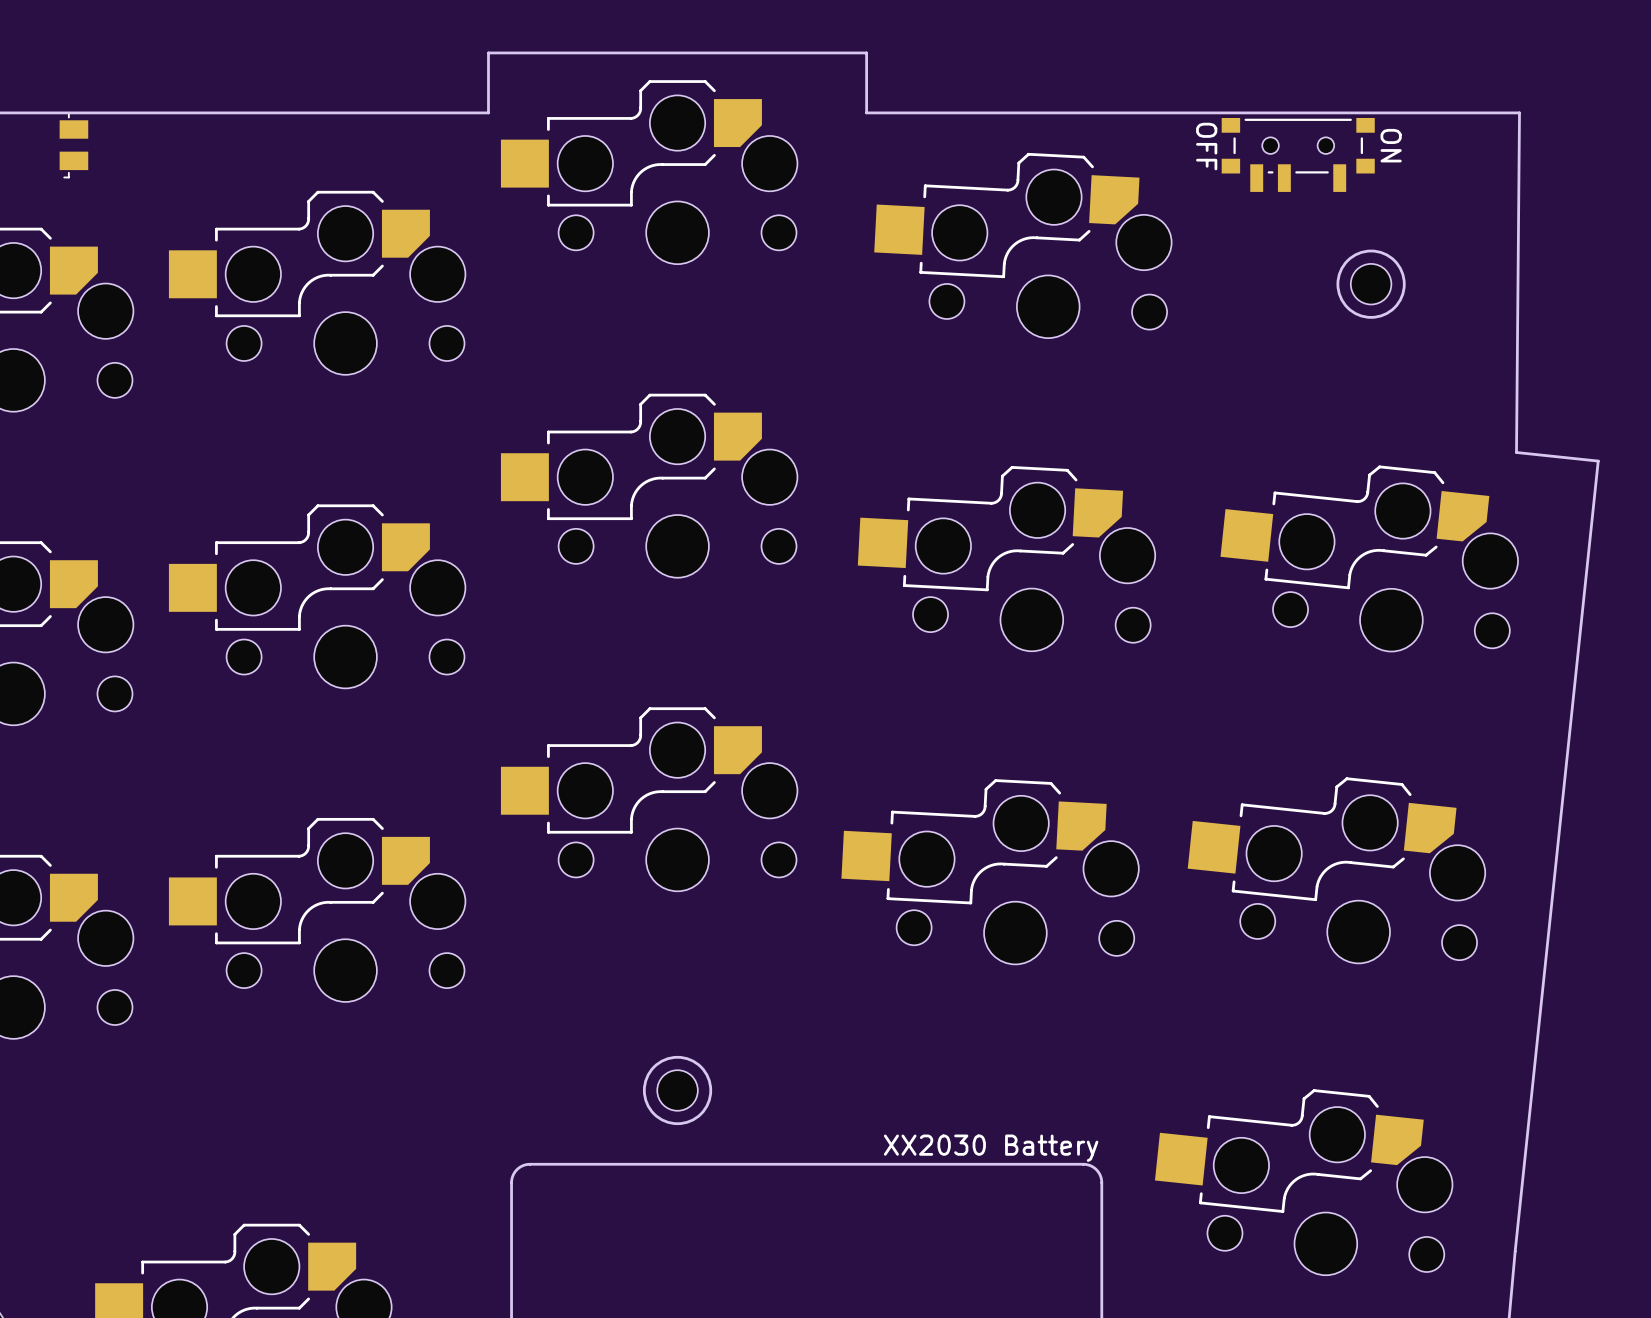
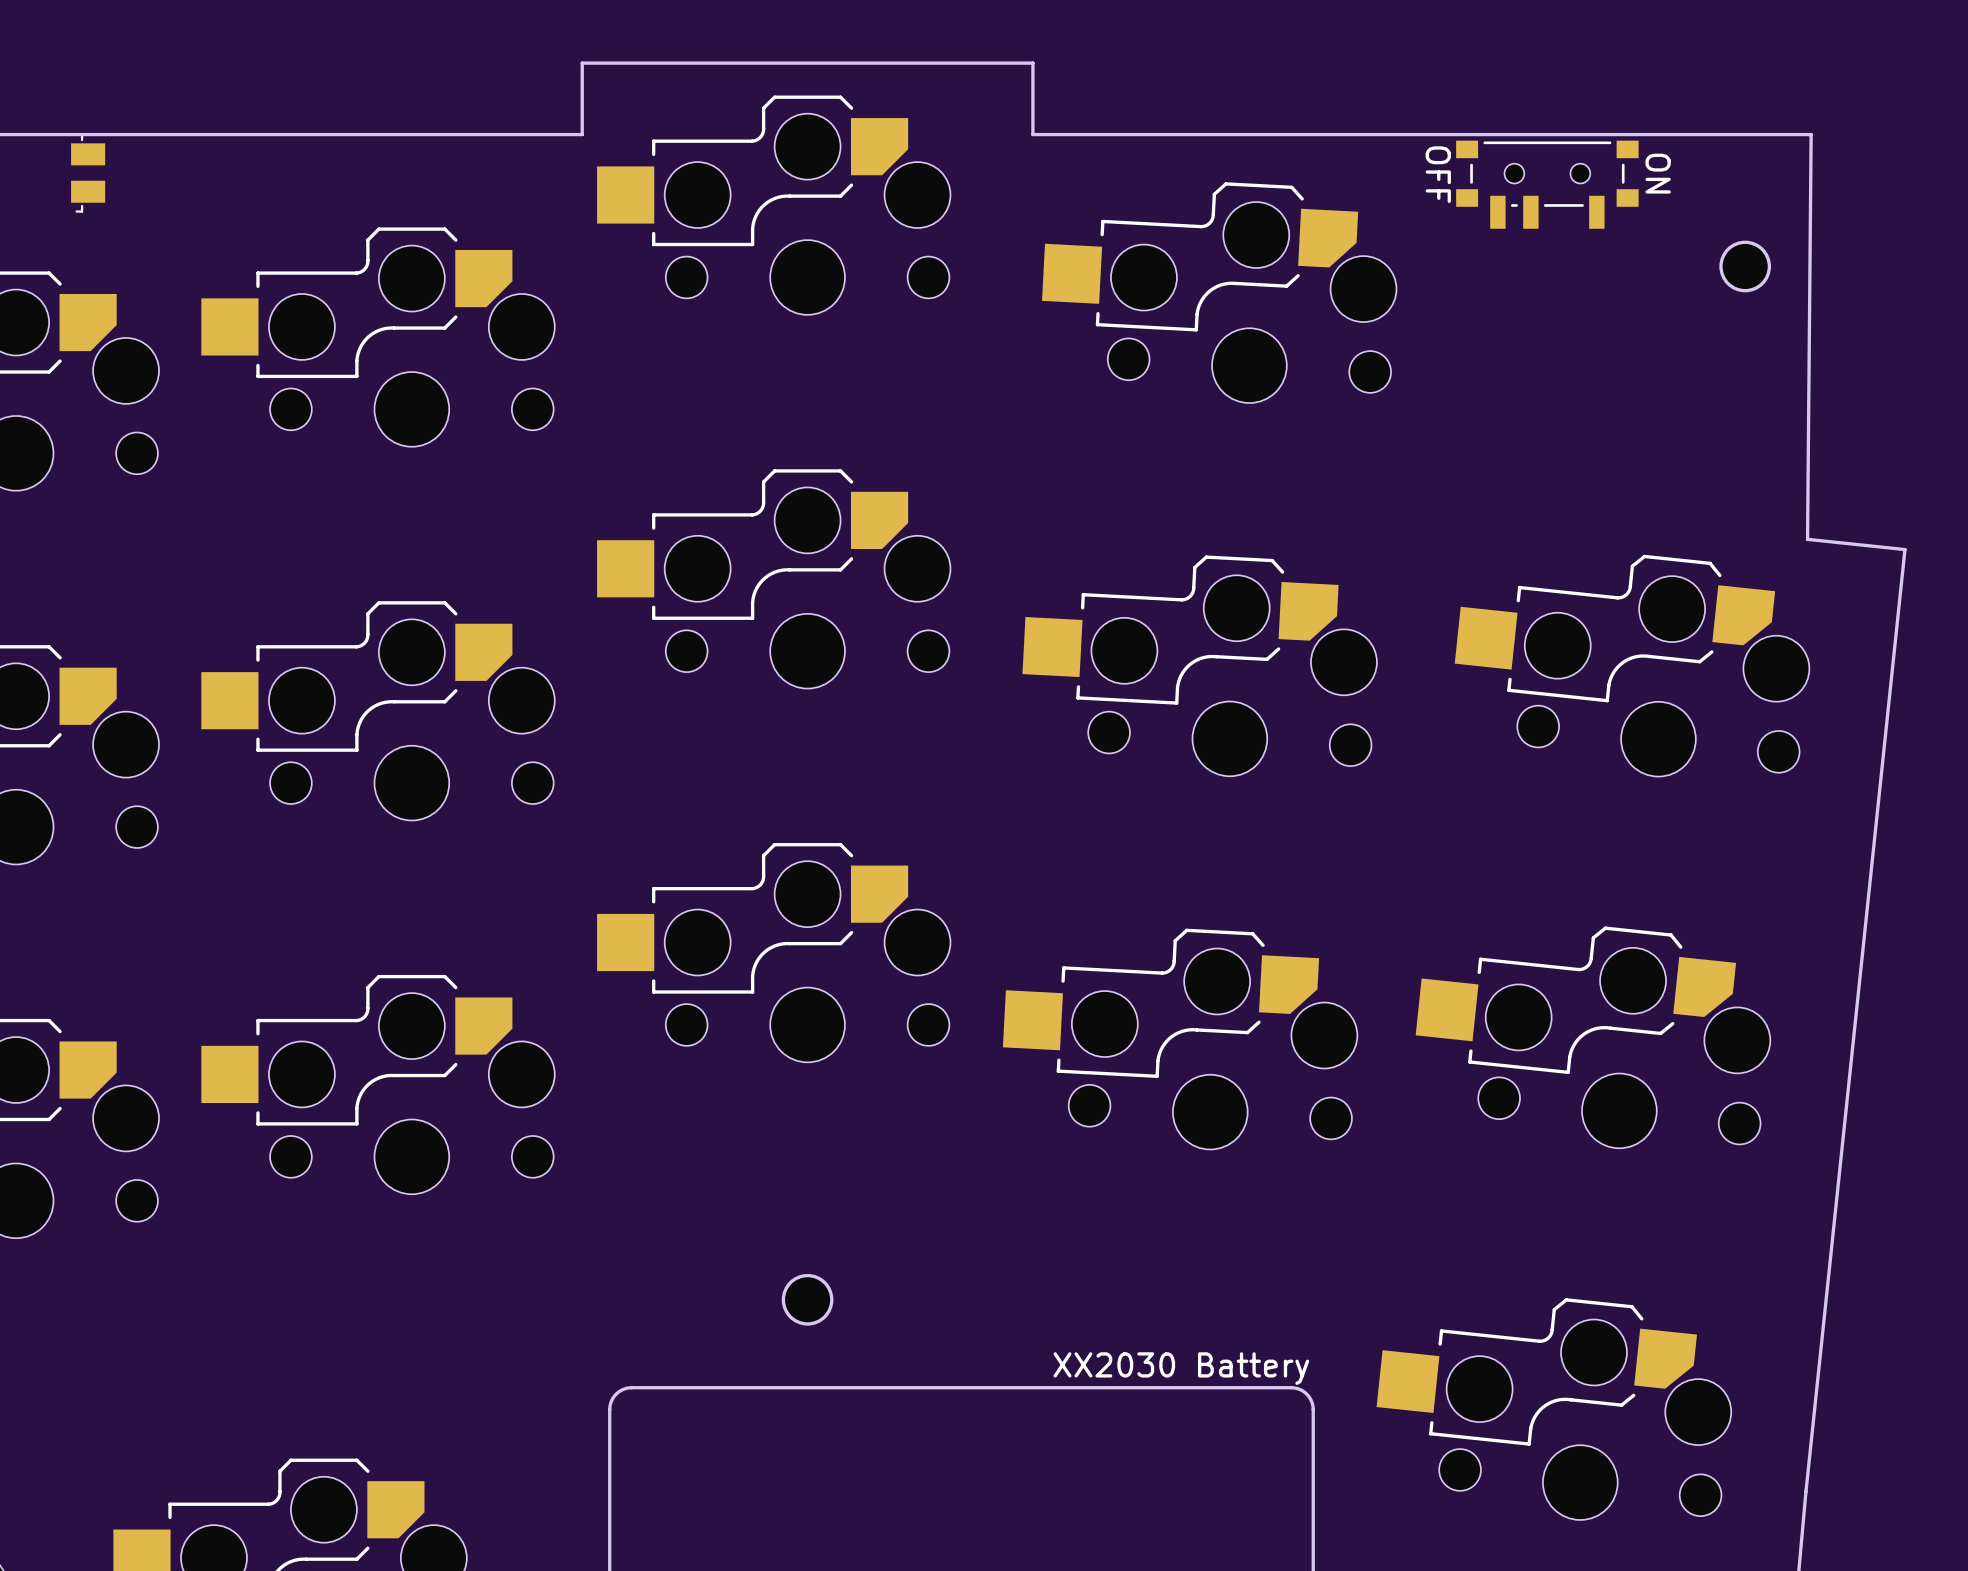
round board edge: none -> [1719, 240, 1772, 293]
round board edge: [1336, 249, 1406, 319] -> none
part position: (1371, 284) -> (1745, 266)
round board edge size: [642, 1055, 713, 1126] -> [781, 1273, 834, 1326]

